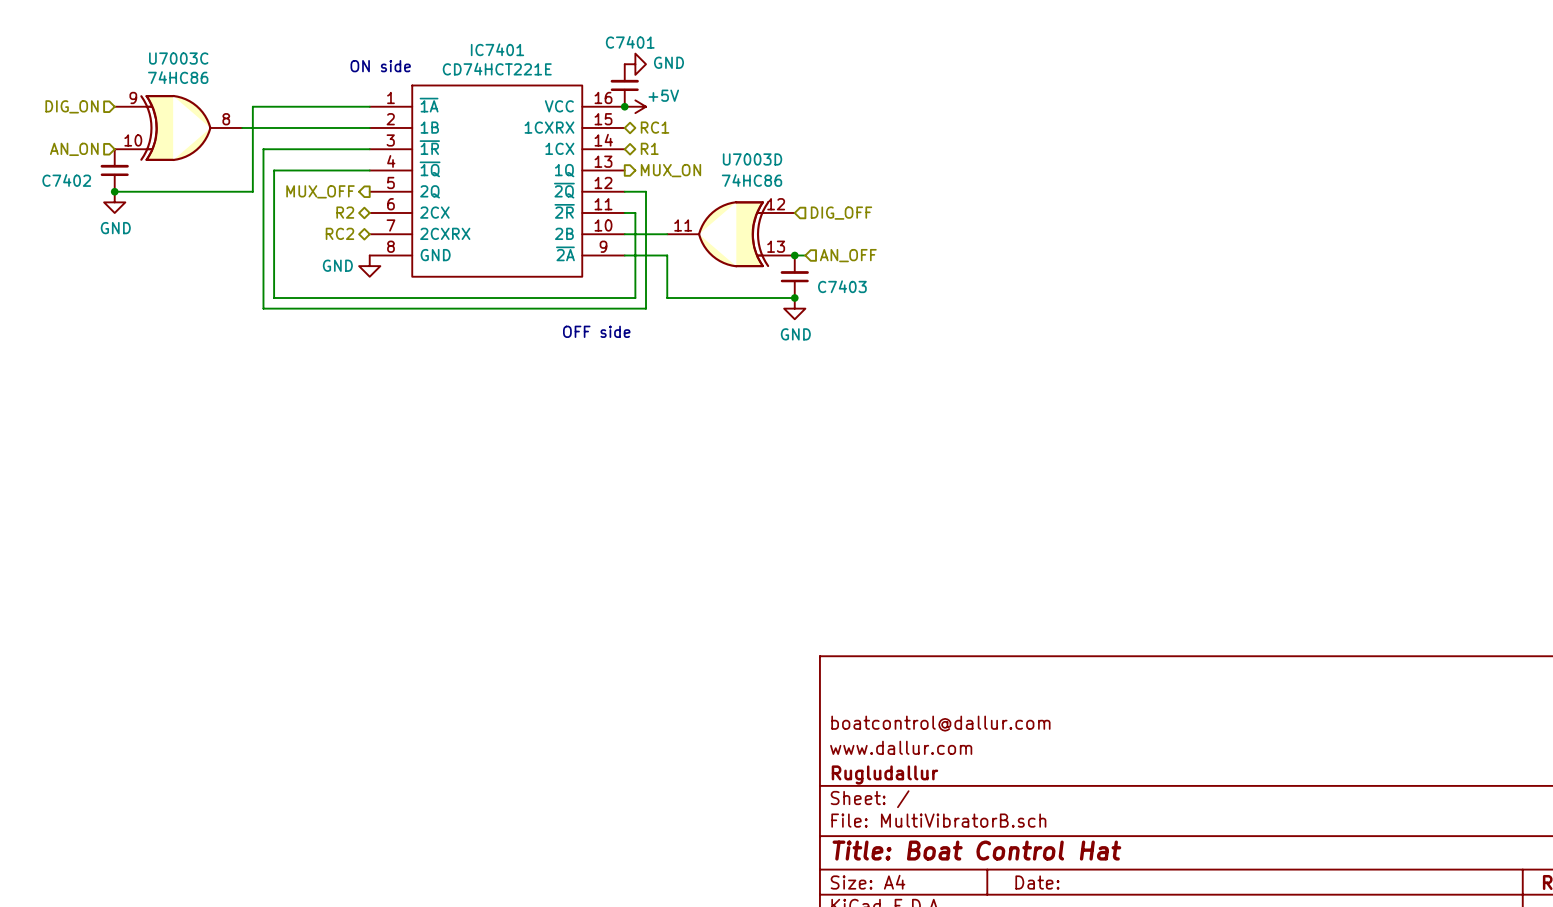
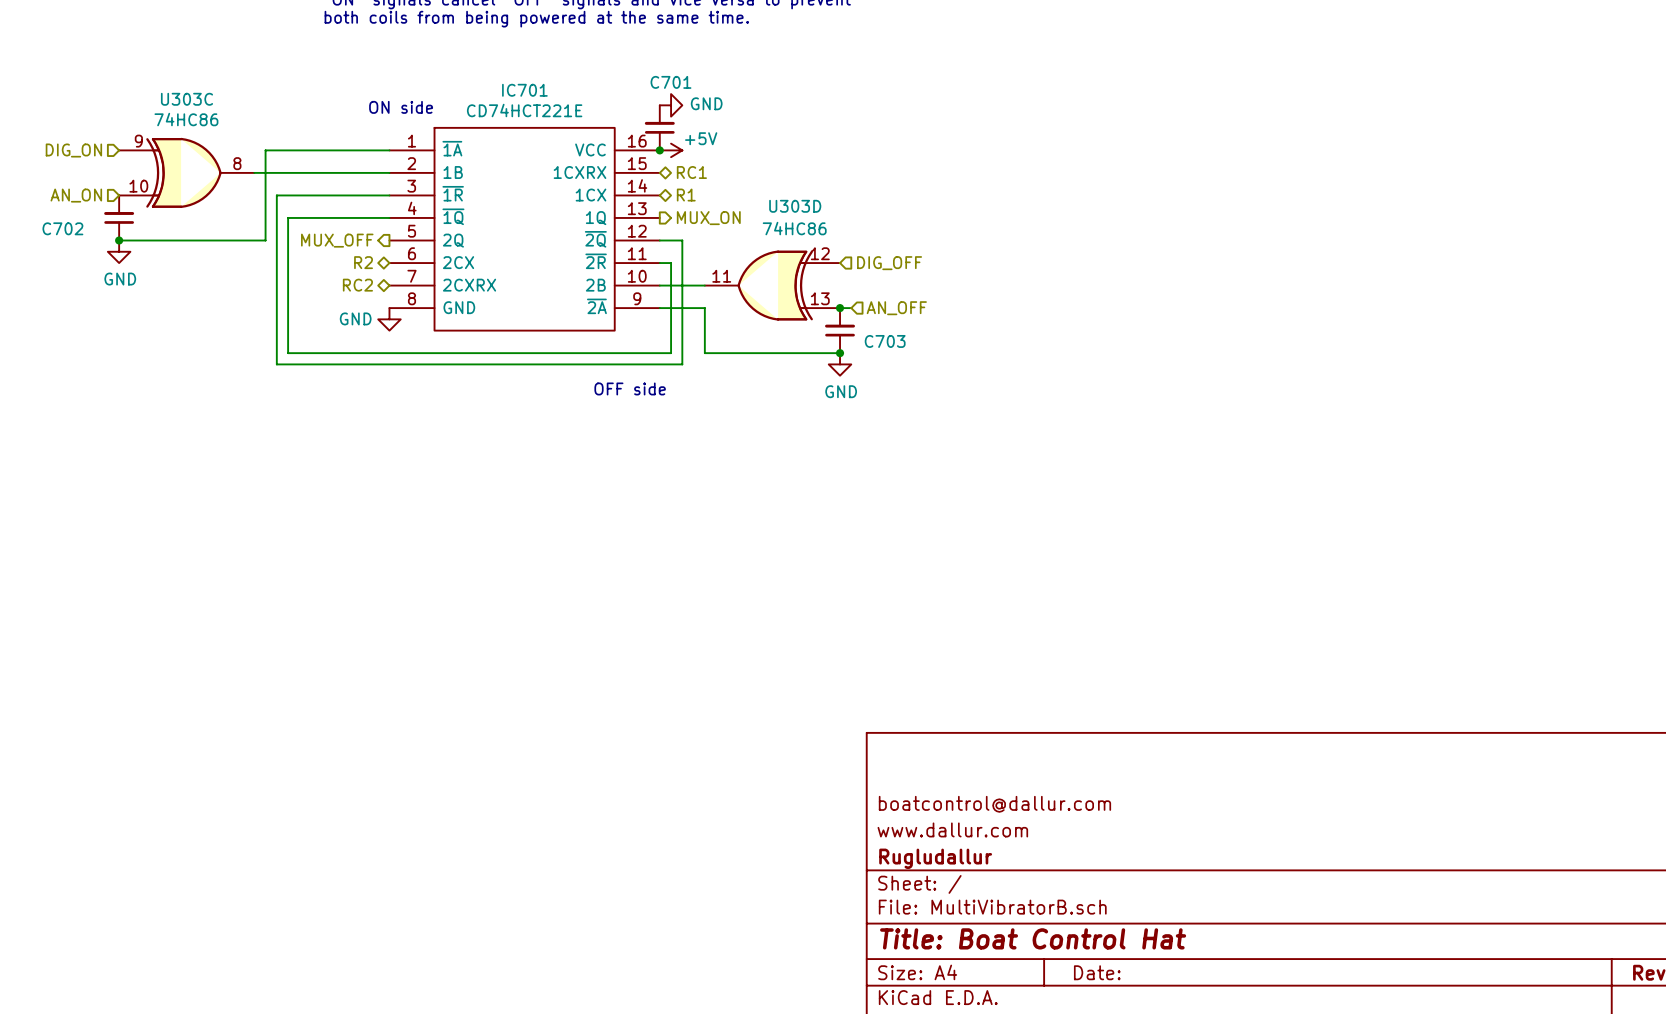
C7401 name: C7401 (630, 42) -> C701 (670, 82)
IC7401 name: IC7401 (497, 49) -> IC701 (524, 90)
U7003C name: U7003C (178, 58) -> U303C (186, 99)
U7003D name: U7003D (752, 159) -> U303D (795, 206)
C7402 name: C7402 (66, 180) -> C702 (62, 228)
C7403 name: C7403 (842, 286) -> C703 (885, 341)

